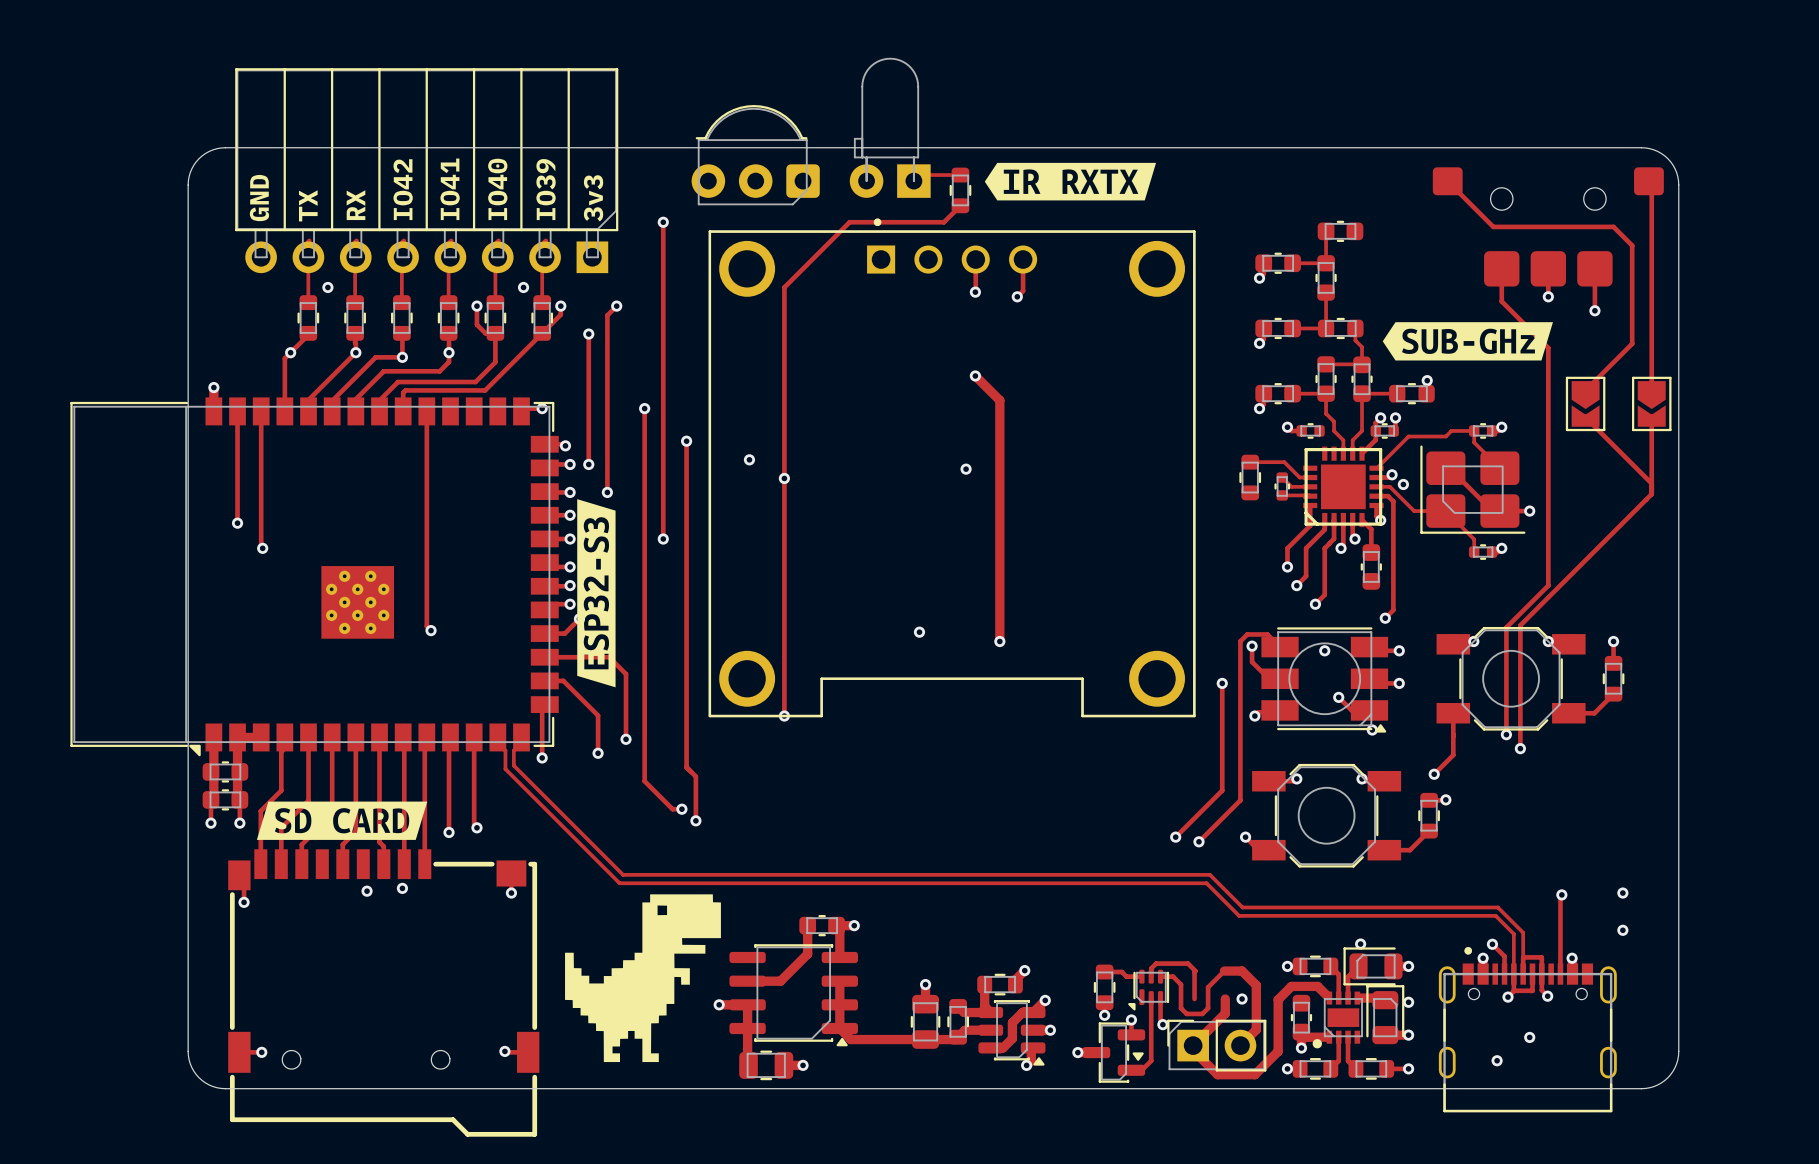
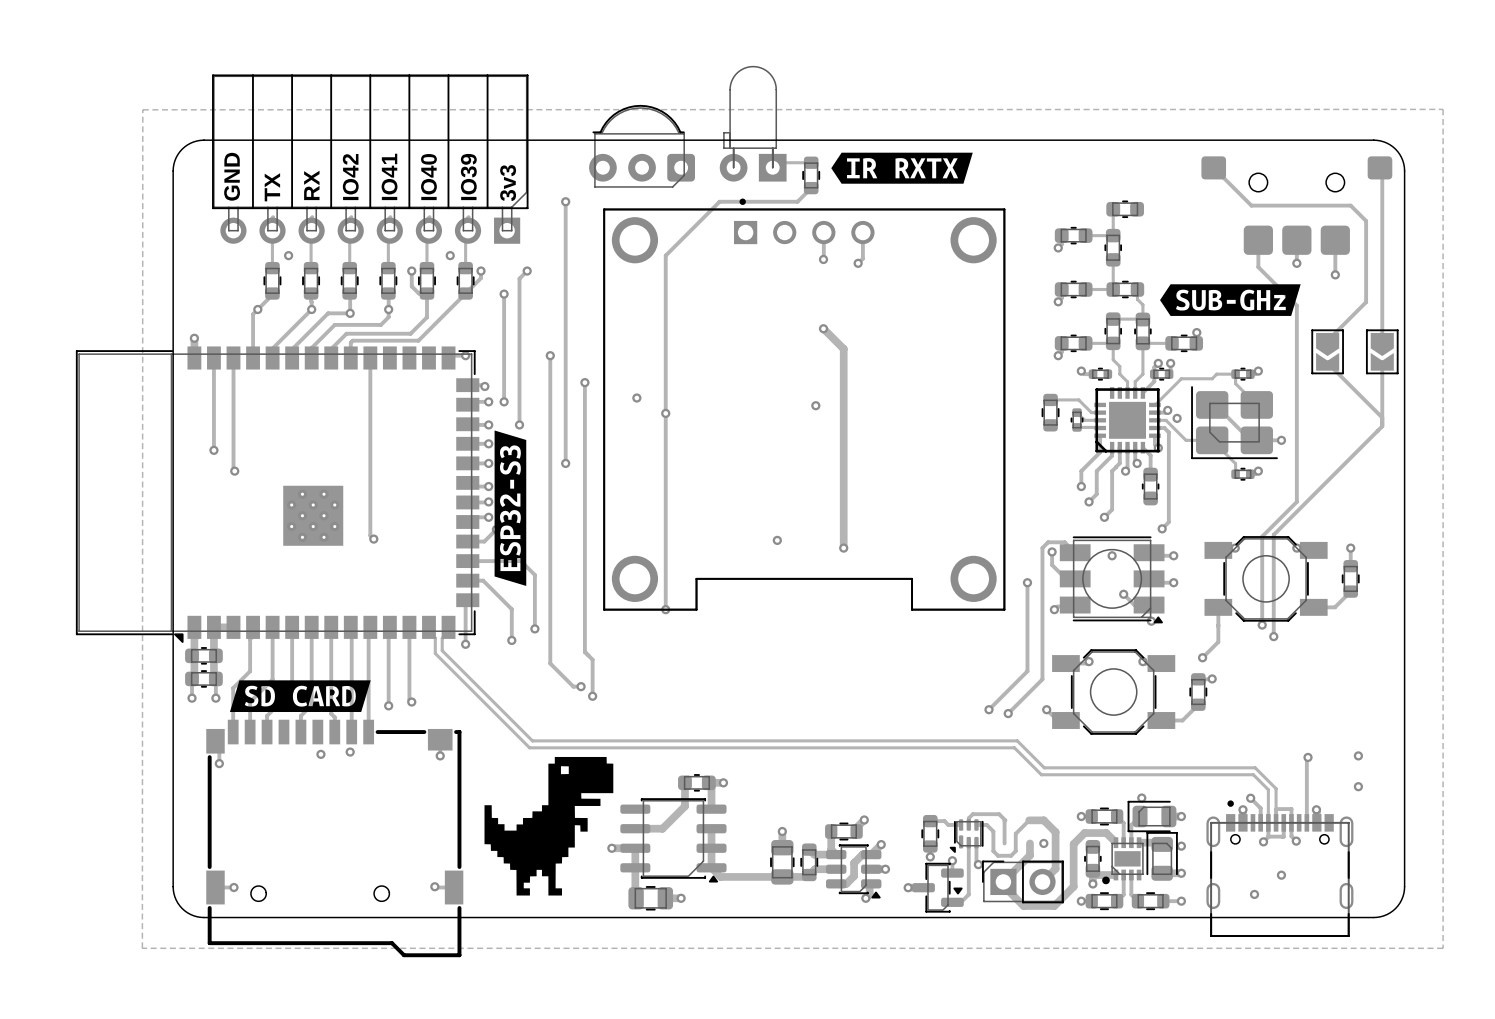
zone outline: none -> (1443, 109) (142, 109) (142, 948) (1443, 948) (1443, 109)

